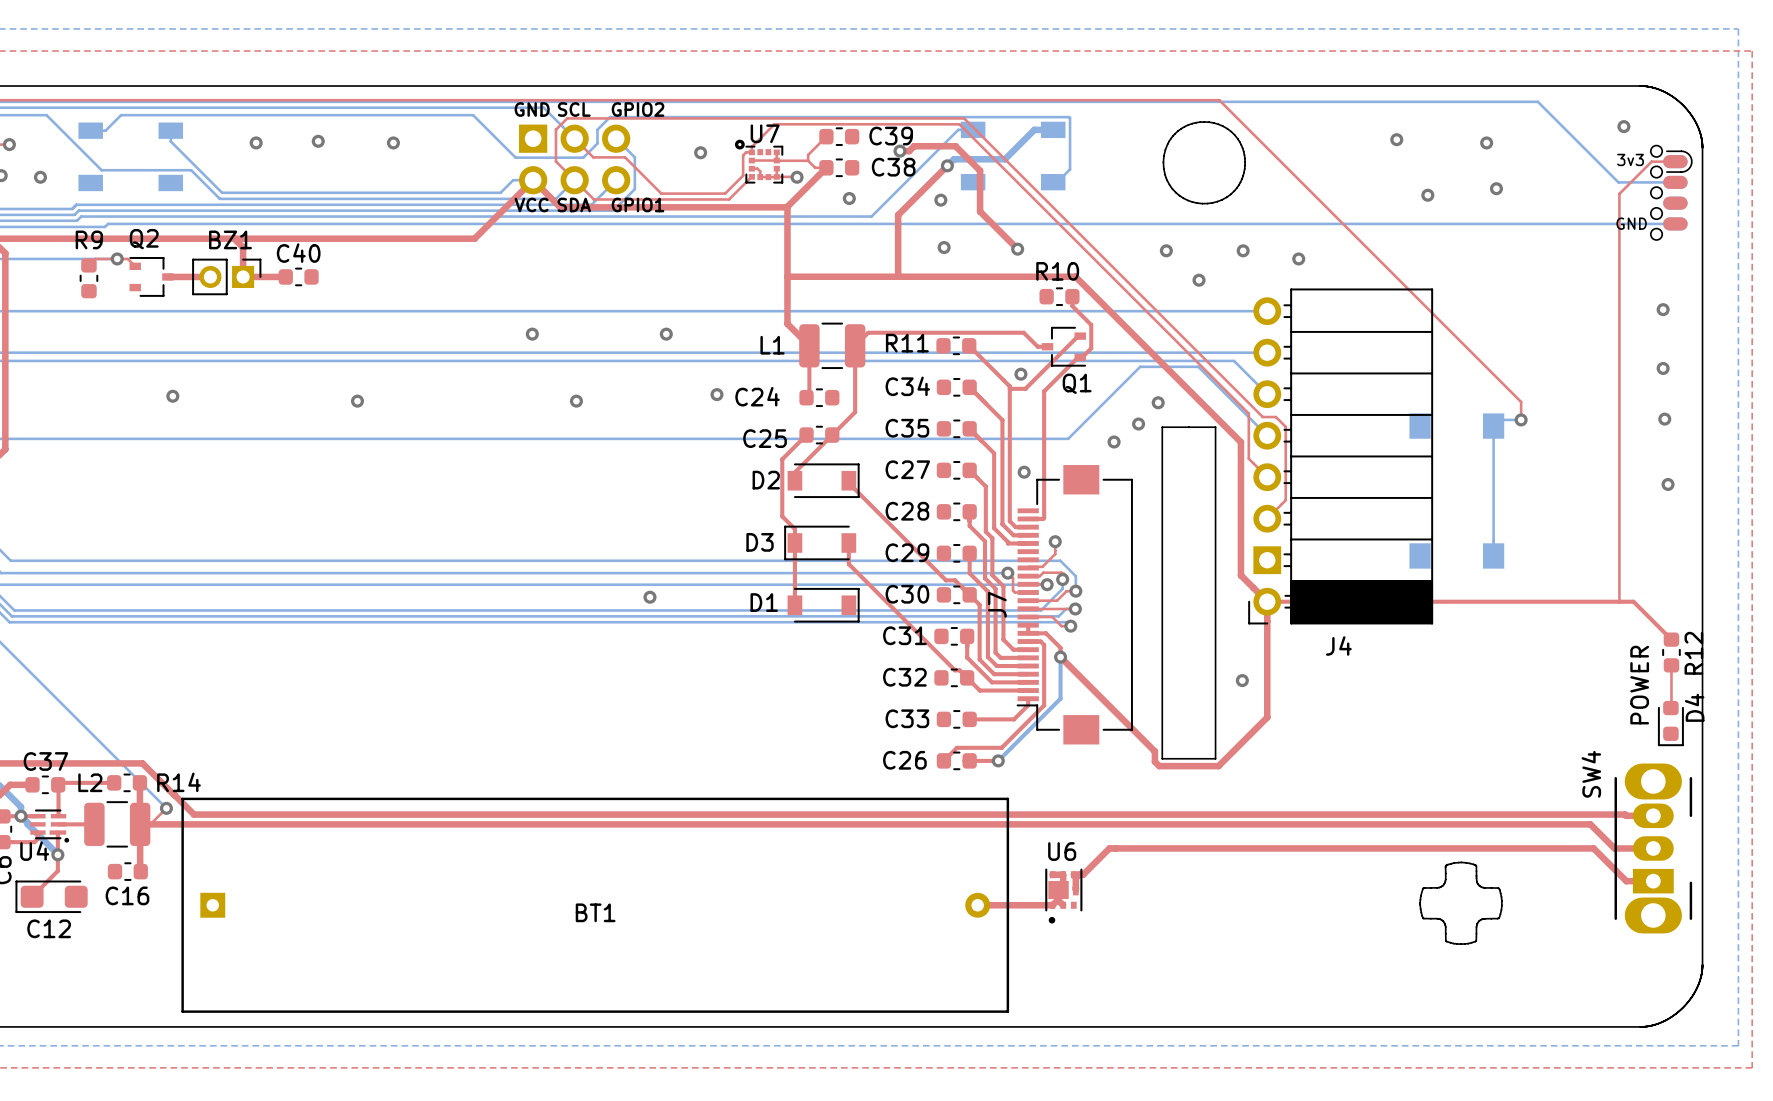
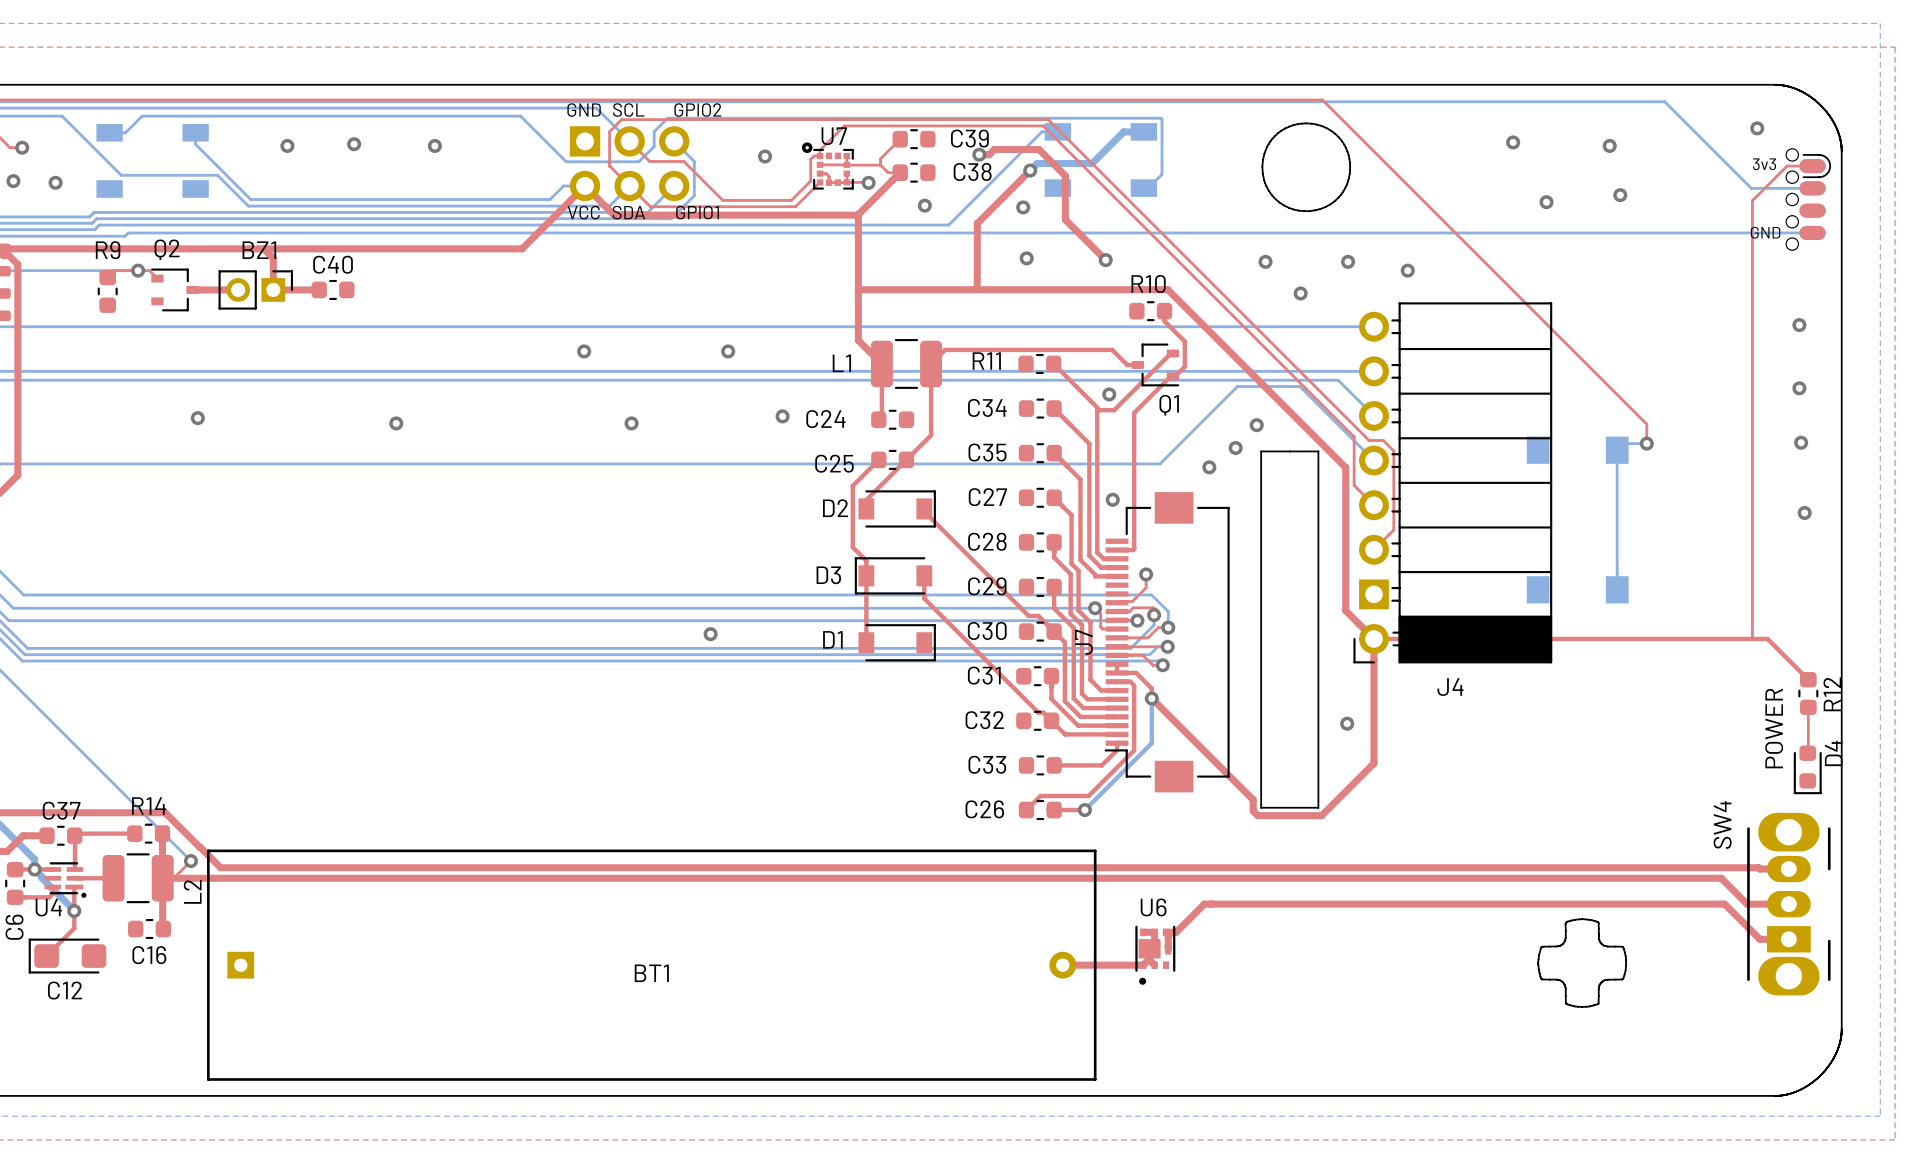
L2 name rotation: 0° (90, 782) -> 90° counterclockwise (192, 891)
L2 name position: L2 (90, 782) -> L2 (192, 891)
R14 name position: R14 (178, 782) -> R14 (149, 806)

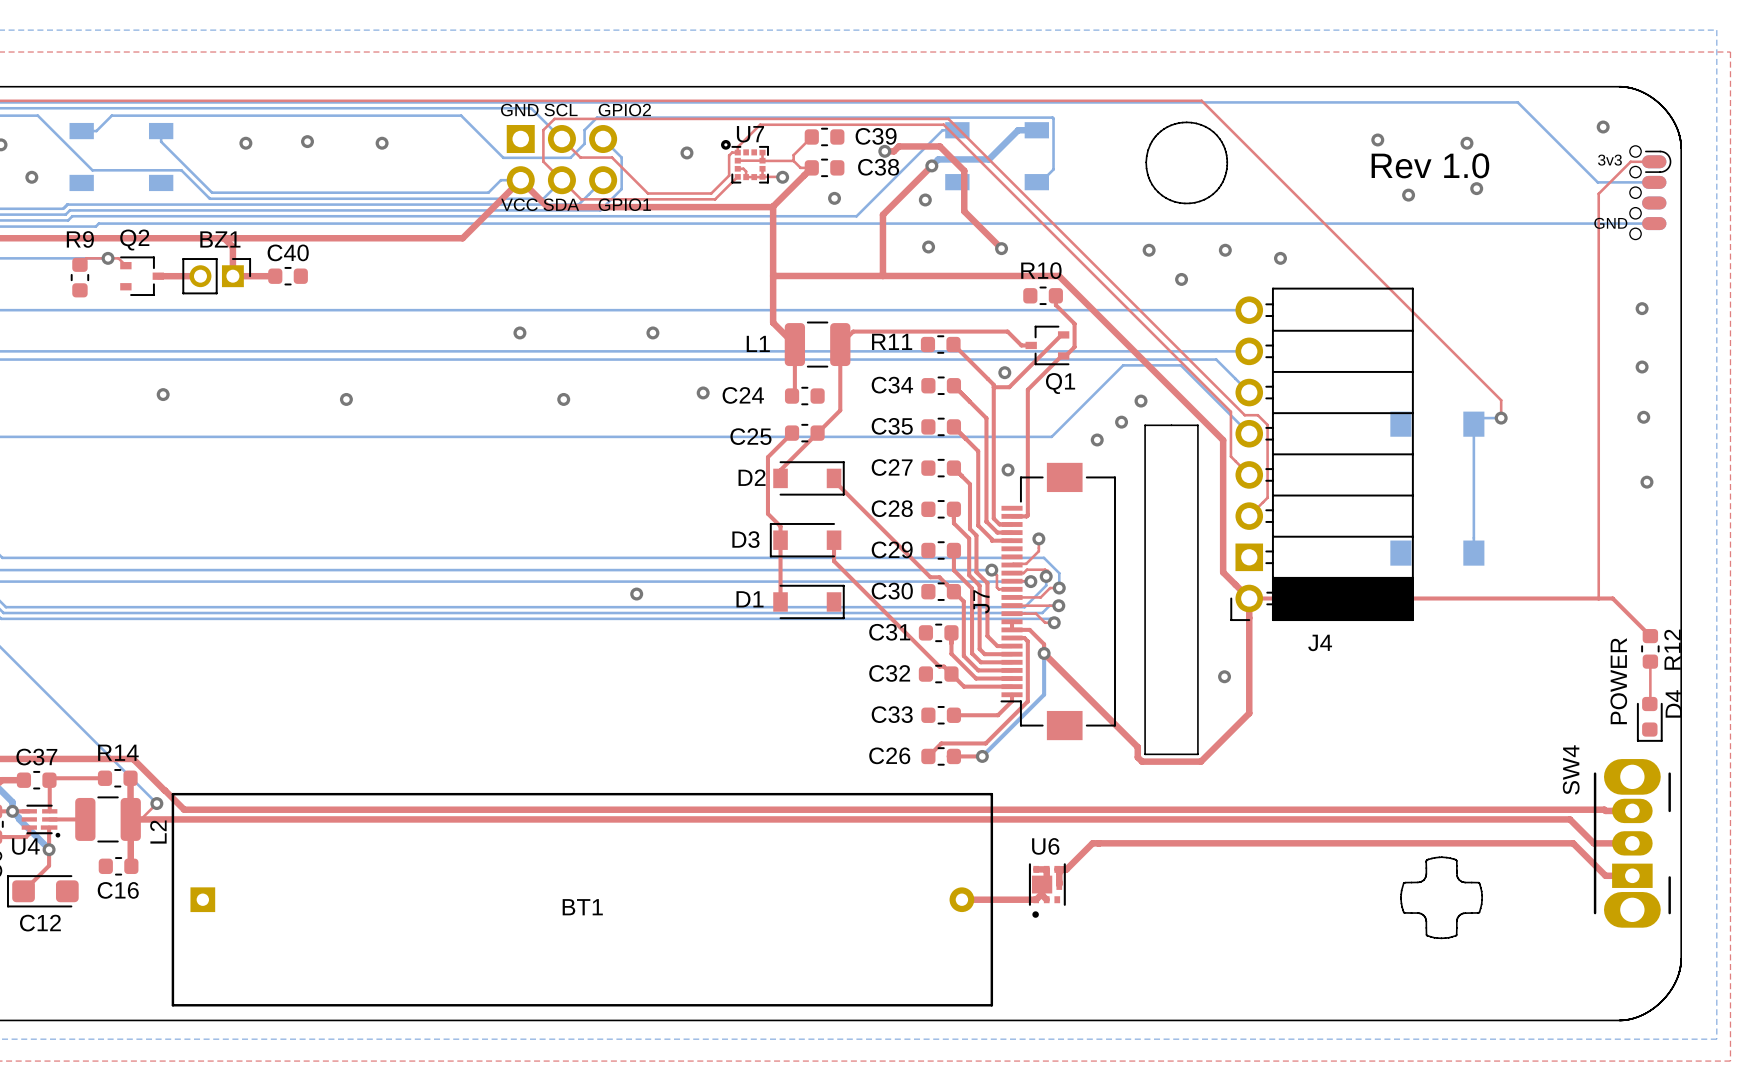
text: none -> Rev 1.0 (1430, 165)

